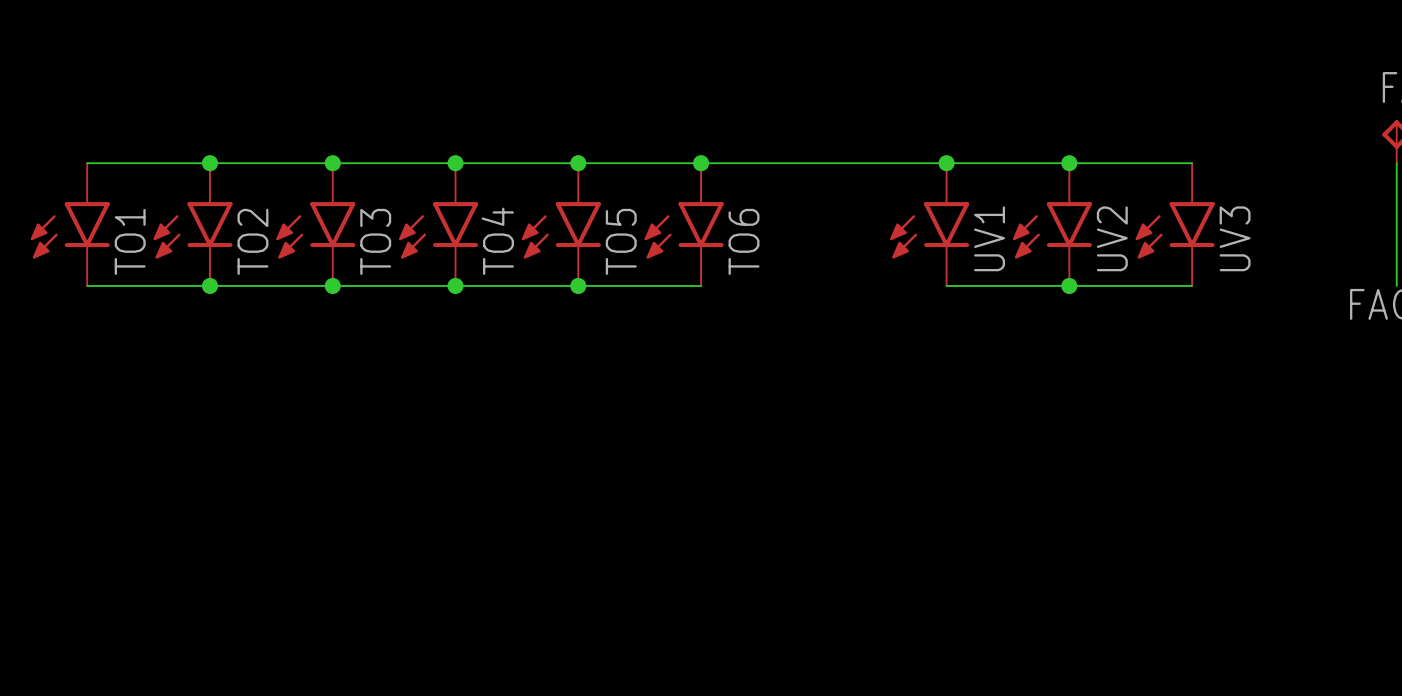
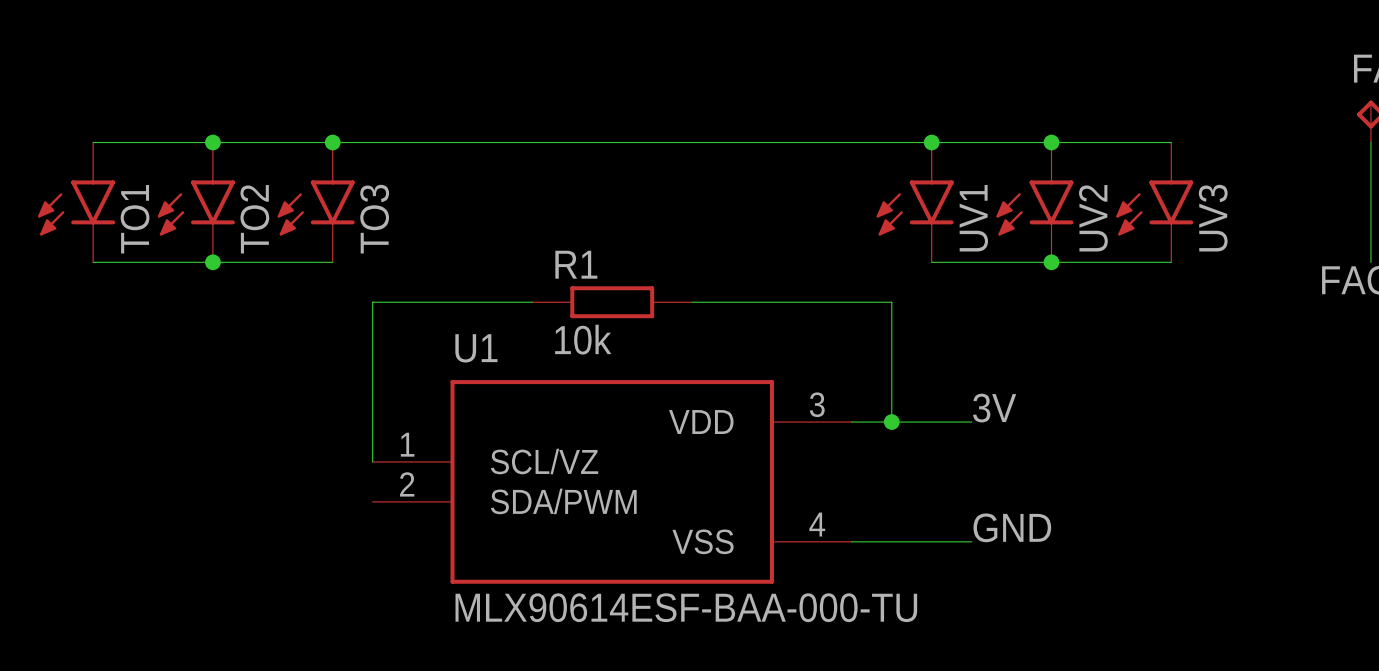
junction: (455, 163) -> none
junction: (578, 163) -> none
junction: (701, 163) -> none
TO4: (438, 224) -> none
TO5: (561, 224) -> none
TO6: (684, 224) -> none
wire: (332, 285) (701, 285) -> none
junction: (332, 285) -> none
junction: (455, 285) -> none
junction: (578, 285) -> none
wire: none -> (532, 302) (372, 302) (372, 461)
R1: none -> 10k (612, 302)
wire: none -> (692, 302) (891, 302) (891, 422)
label: none -> 3V (994, 408)
wire: none -> (851, 422) (971, 422)
junction: none -> (891, 422)
U1: none -> MLX90614ESF-BAA-000-TU (612, 481)
label: none -> GND (1012, 527)
wire: none -> (851, 541) (971, 541)

